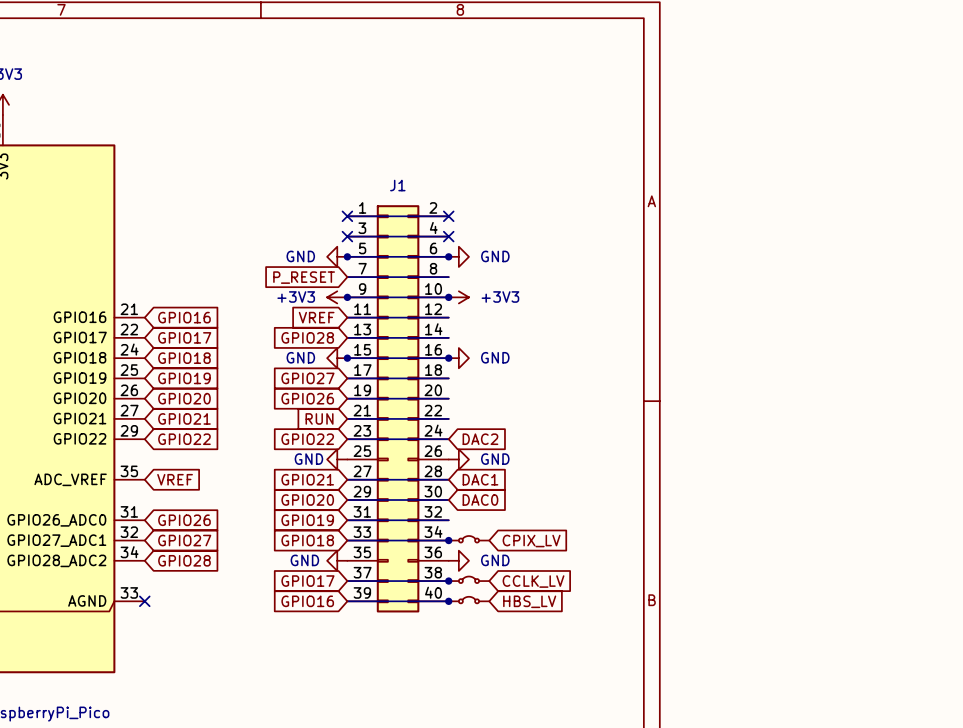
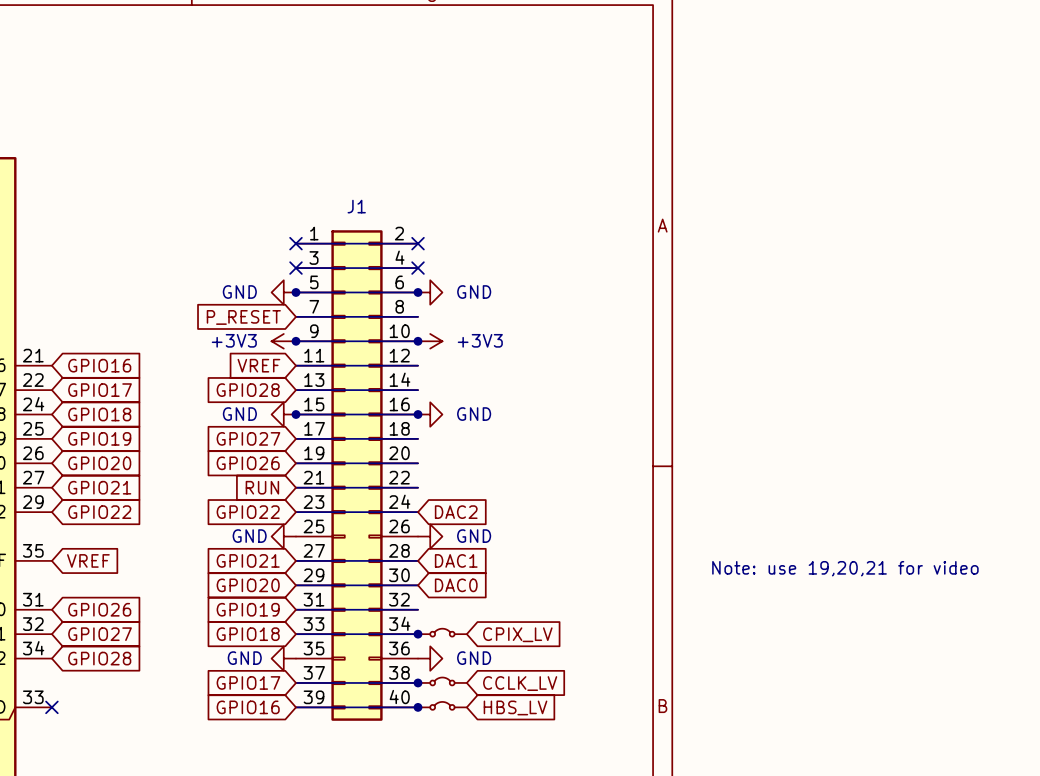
text: none -> Note: use 19,20,21 for video (845, 568)

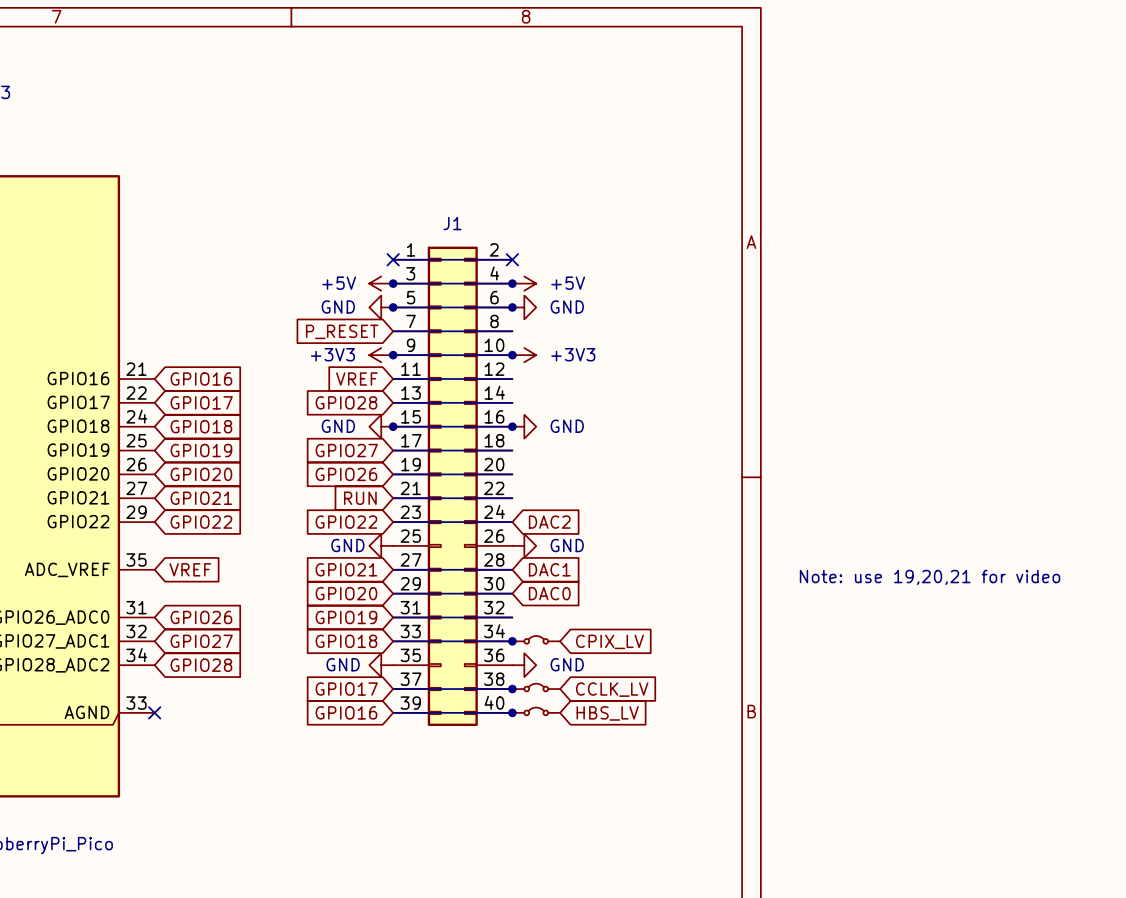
power symbol: none -> +5V (381, 283)
no-connect mark: (295, 268) -> none
junction: none -> (393, 283)
no-connect mark: (418, 268) -> none
junction: none -> (512, 283)
power symbol: none -> +5V (524, 283)

